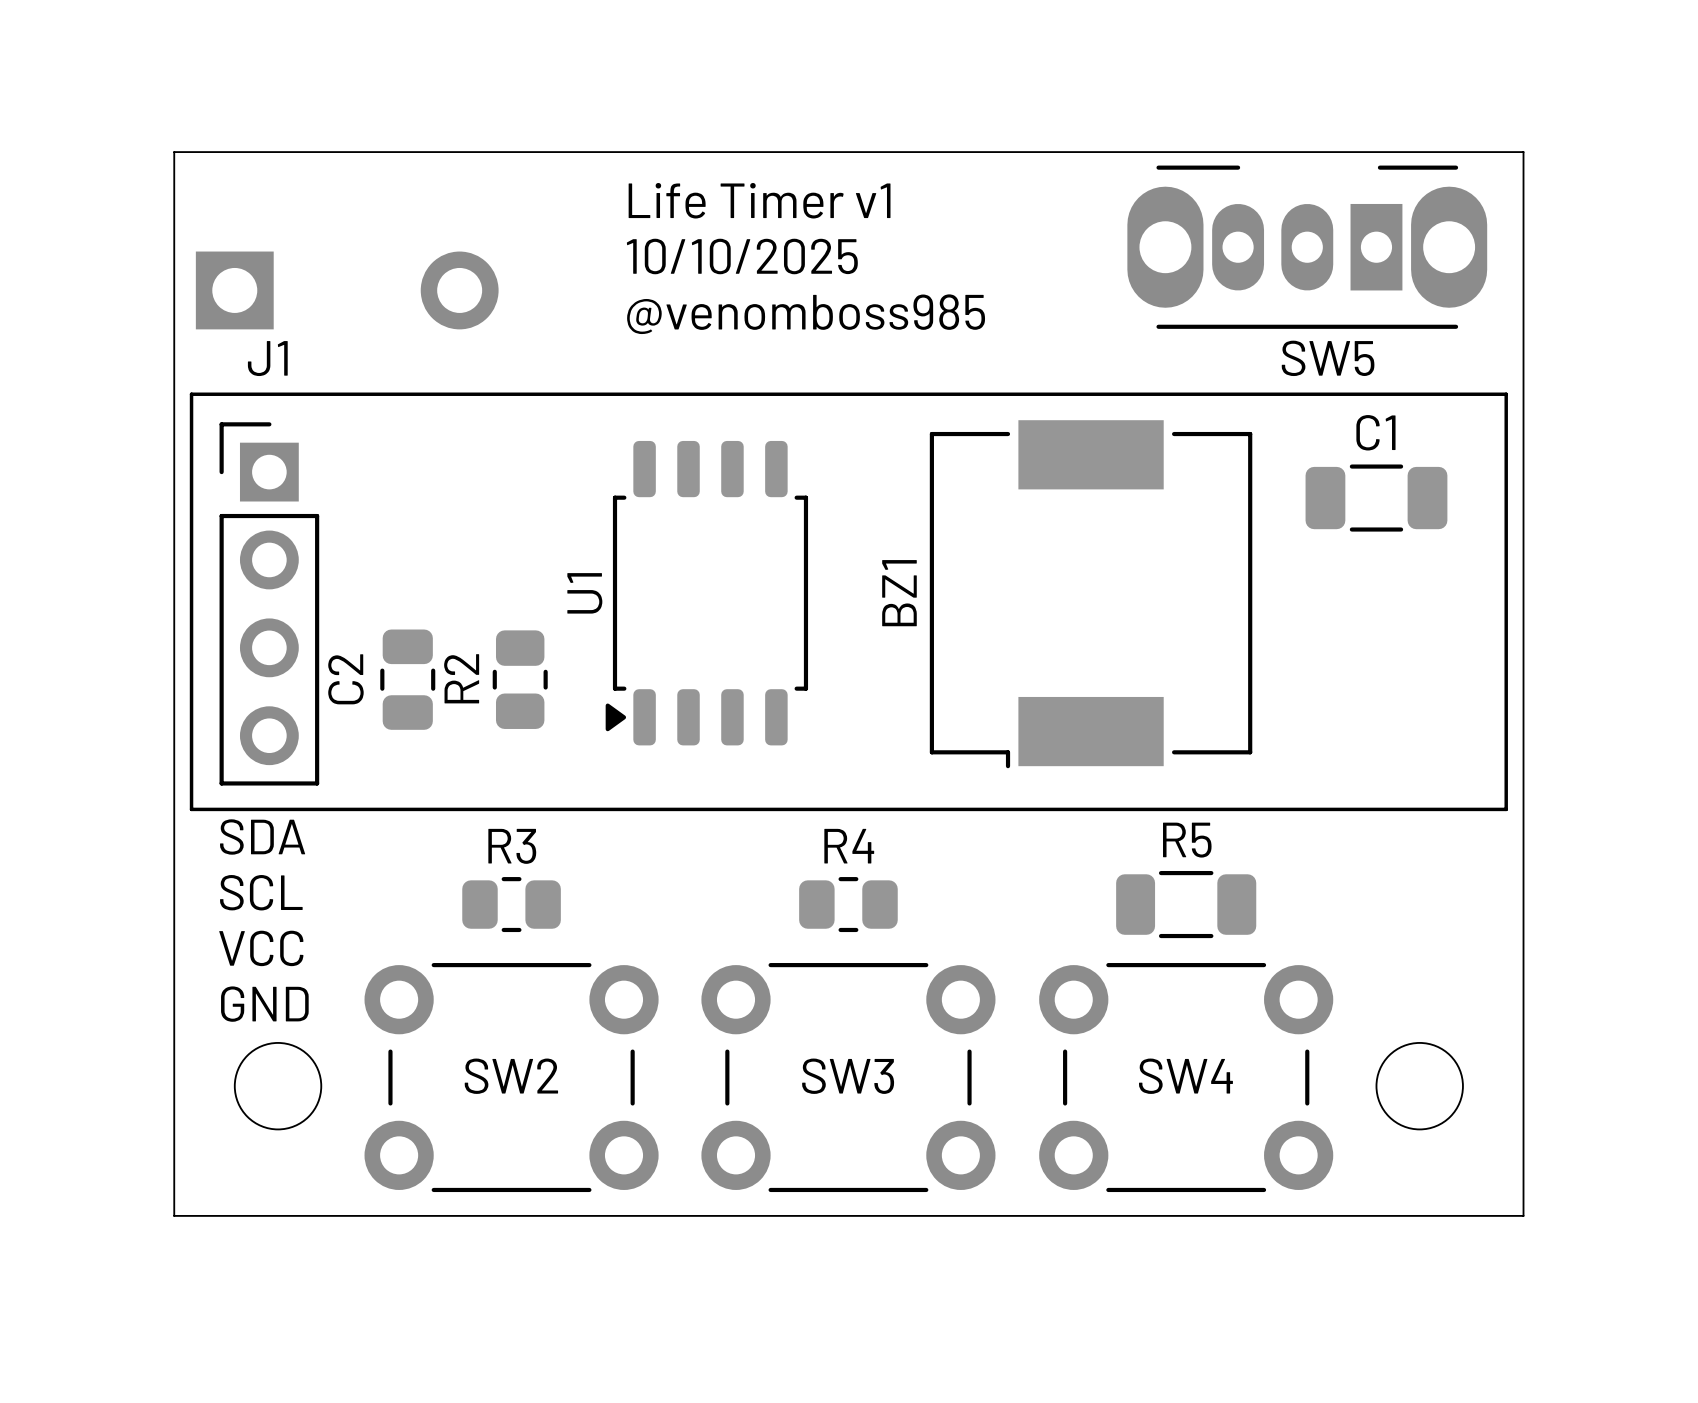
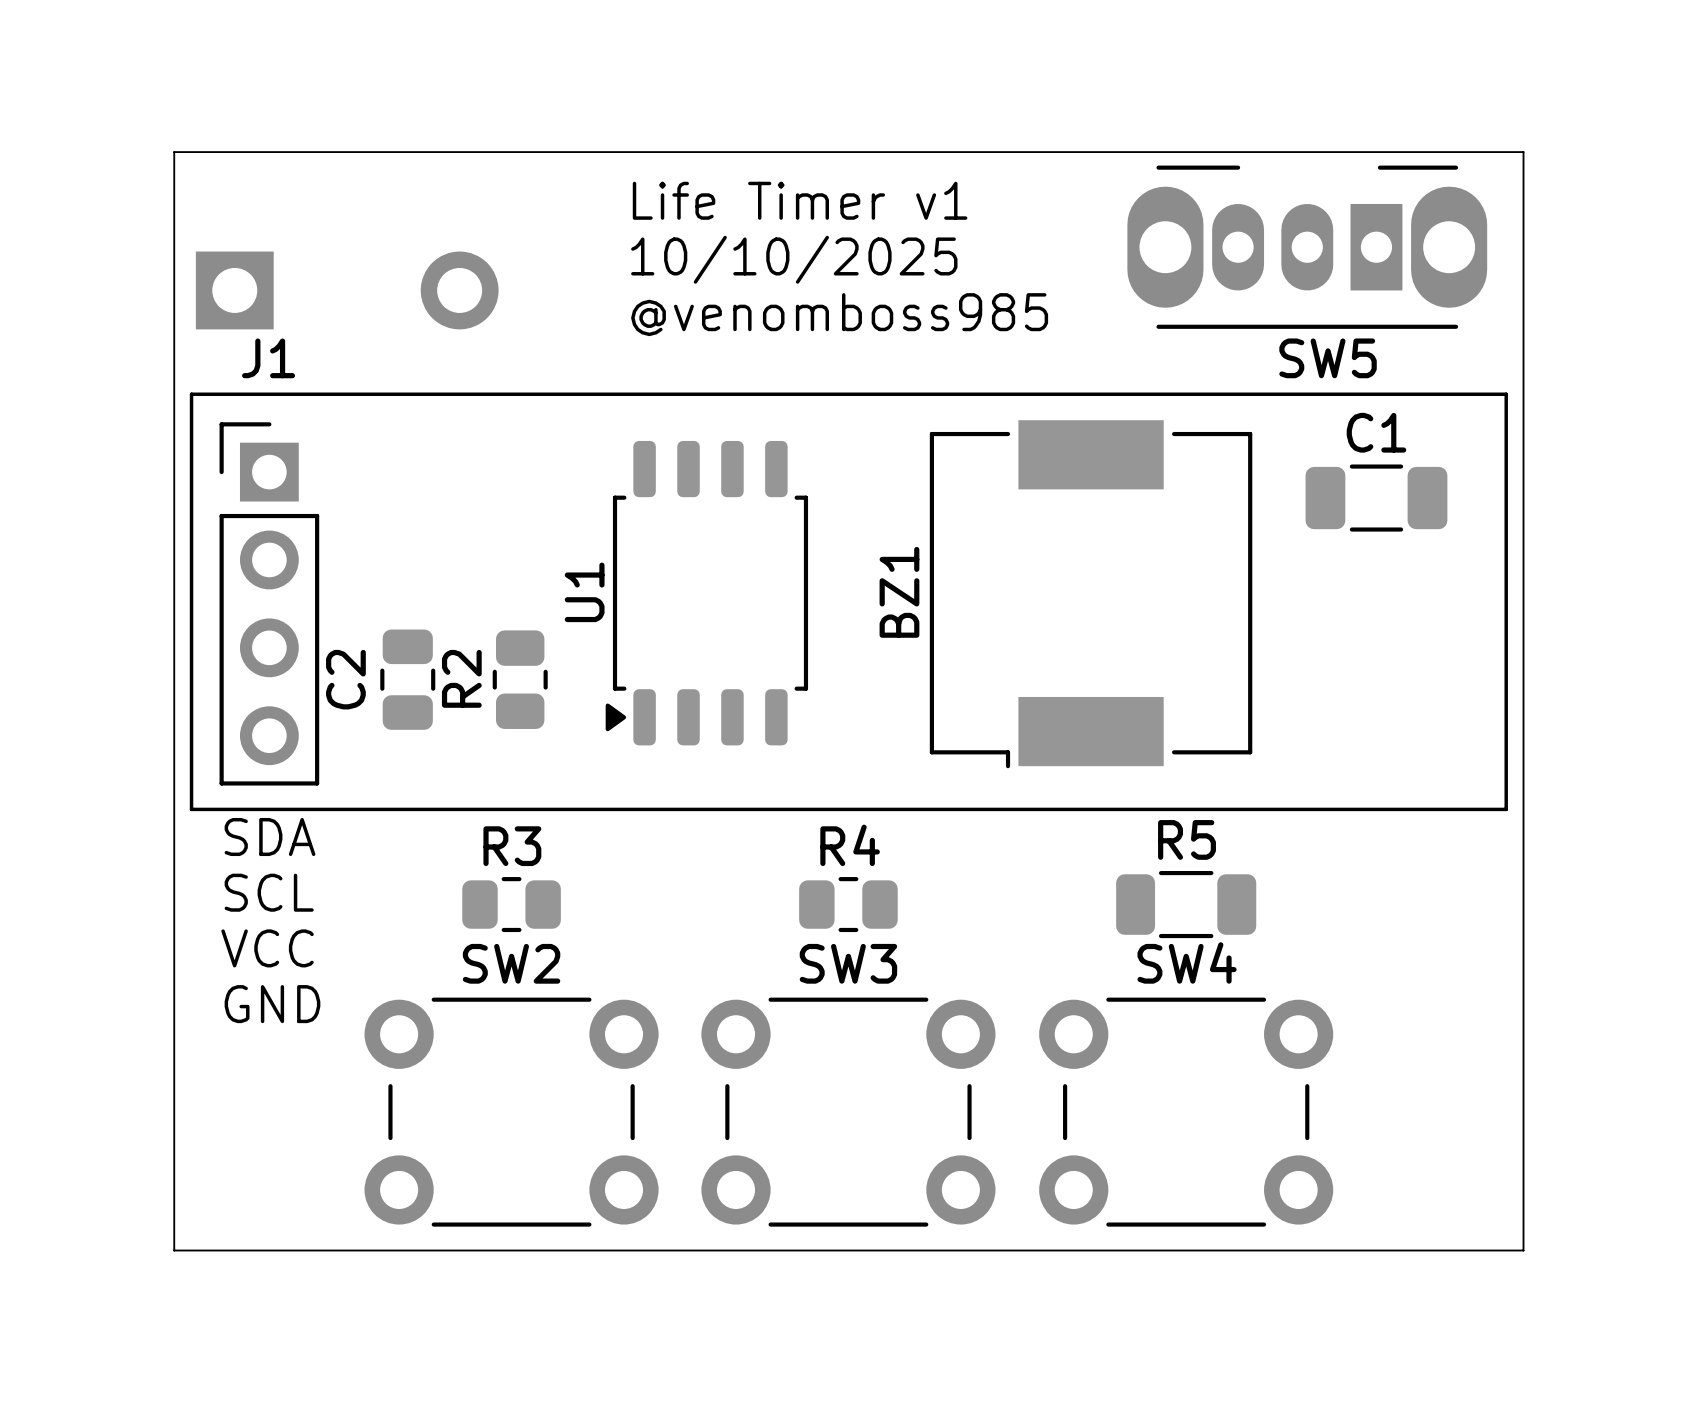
round board edge: [233, 1042, 323, 1131] -> none
round board edge: [1375, 1042, 1464, 1131] -> none
SW2 name position: SW2 (511, 1076) -> SW2 (511, 963)
SW3 name position: SW3 (848, 1076) -> SW3 (848, 963)
SW4 name position: SW4 (1185, 1076) -> SW4 (1187, 962)
SW2 position: (511, 1077) -> (511, 1112)
SW3 position: (848, 1077) -> (848, 1112)
SW4 position: (1186, 1077) -> (1186, 1112)
board edge: (174, 1215) (1523, 1215) -> (174, 1215) (174, 1250) (1523, 1250) (1523, 1215)

